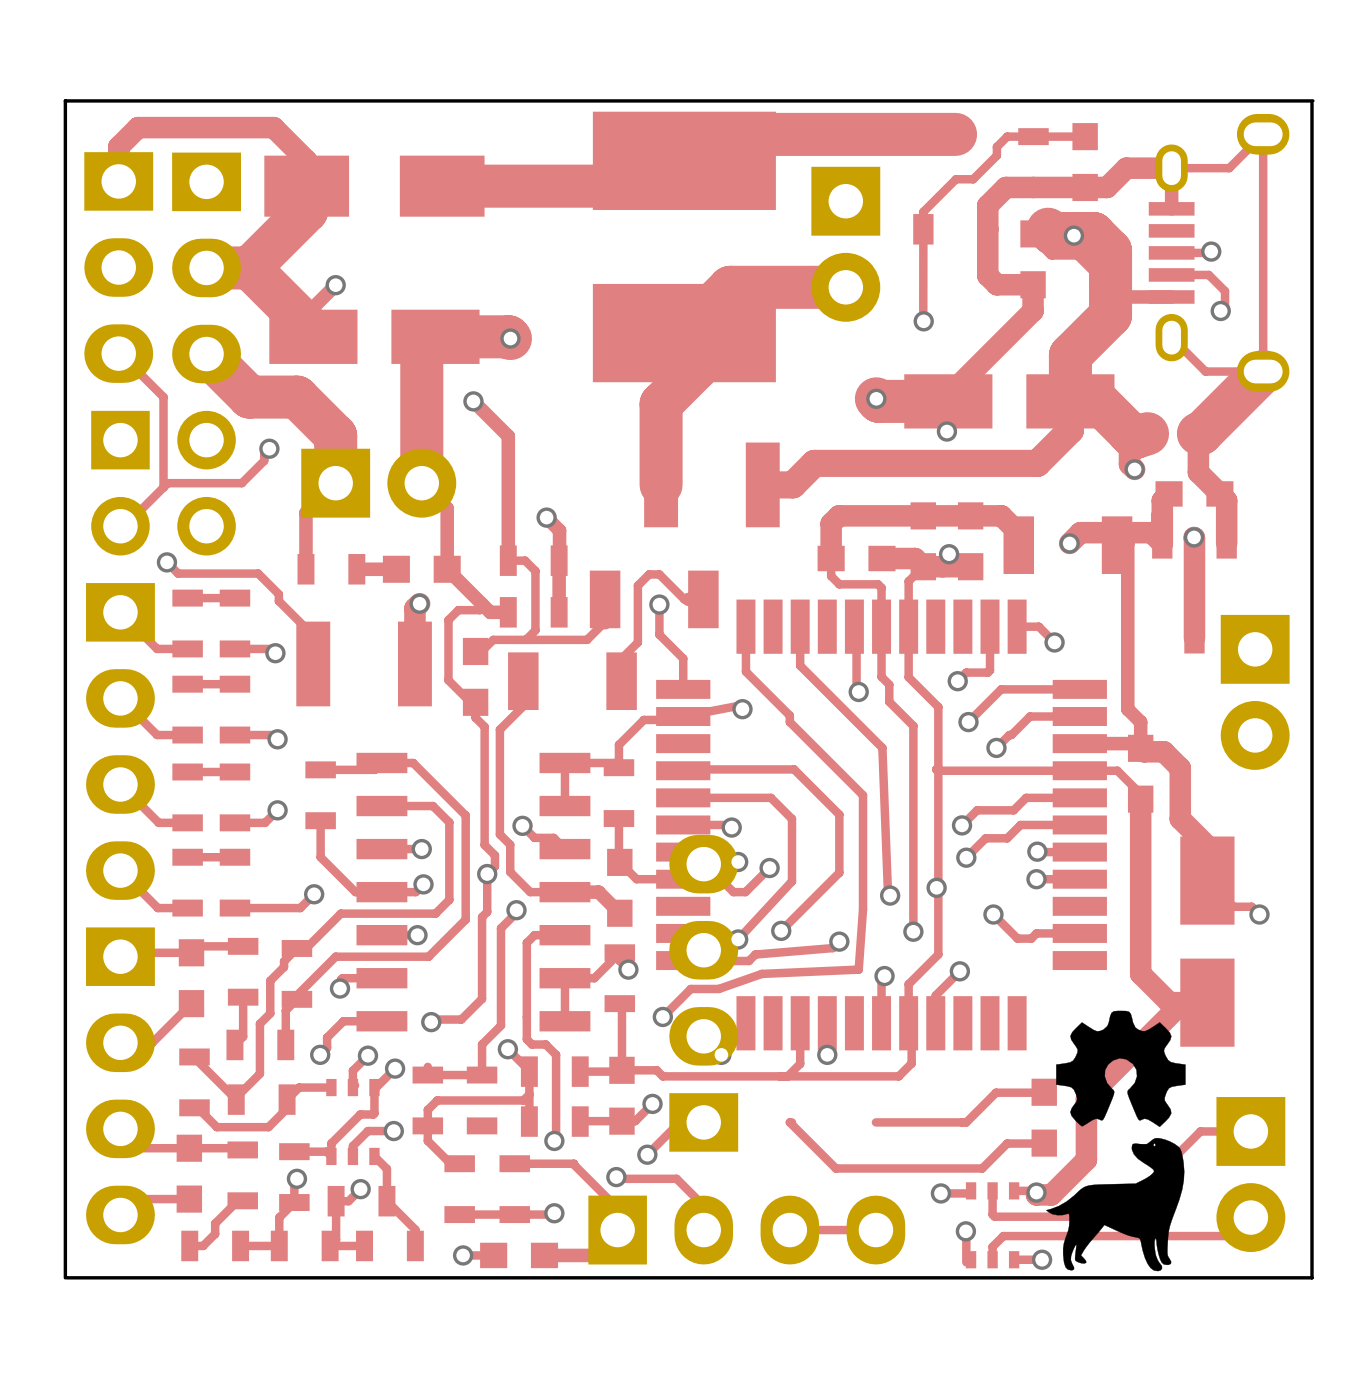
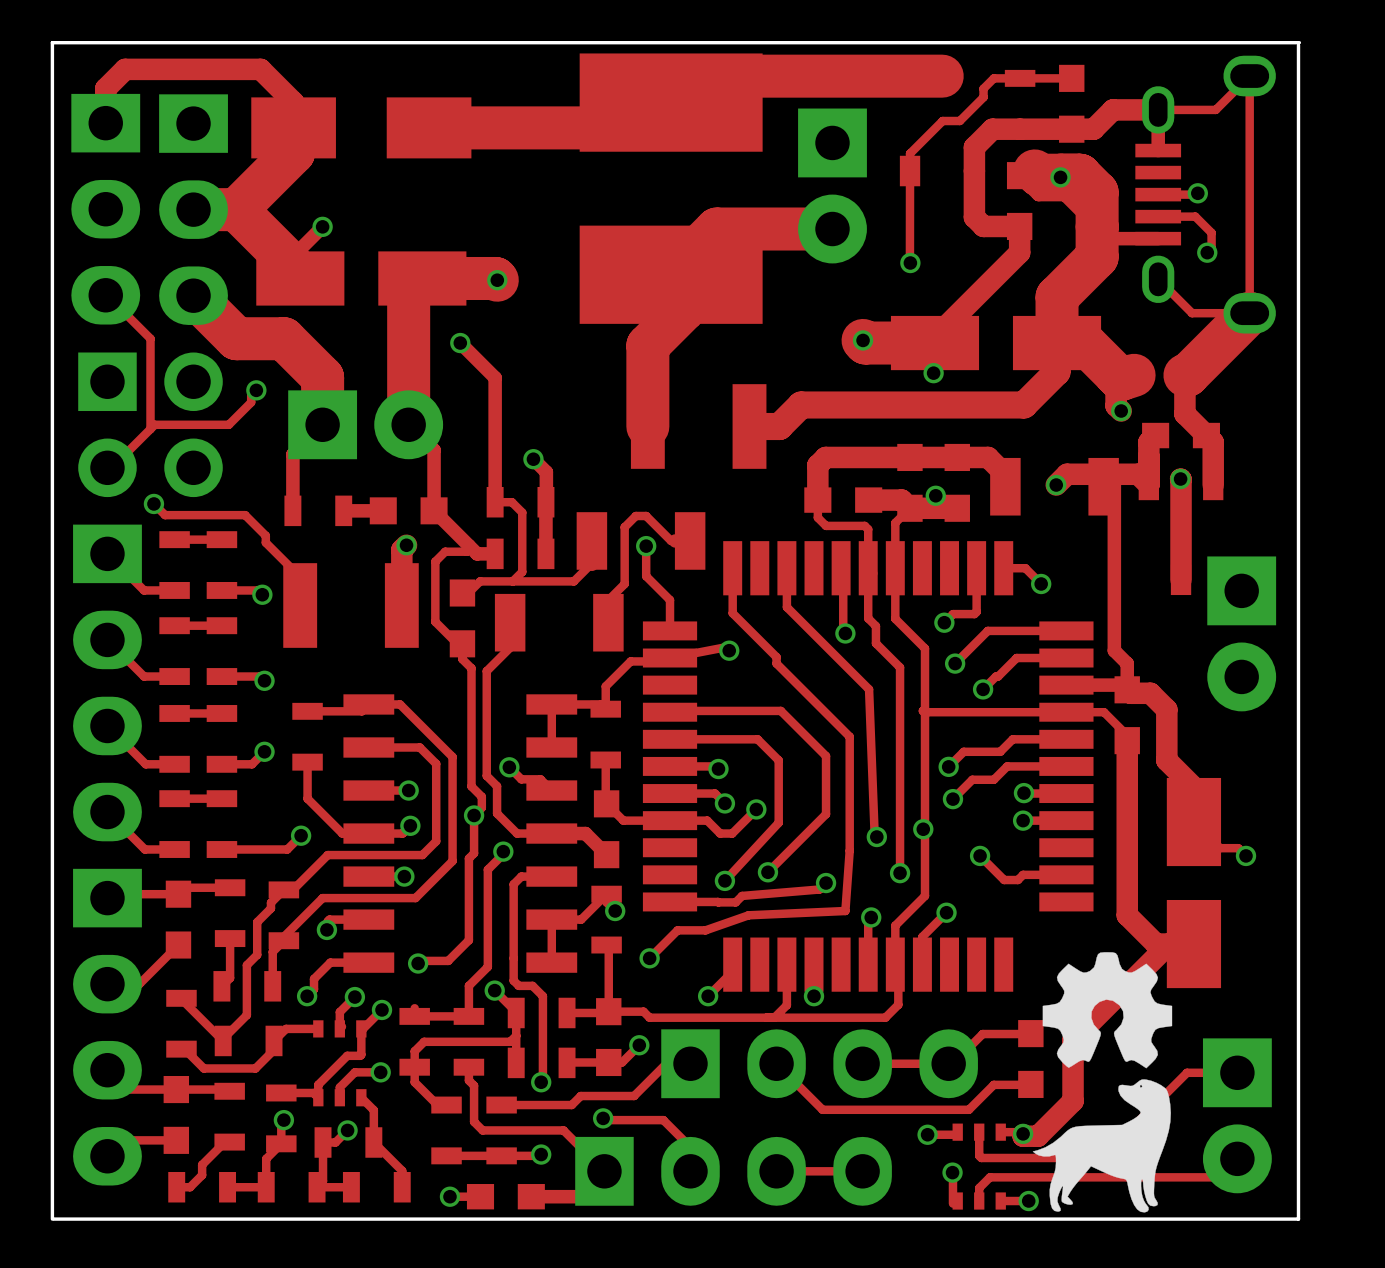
part rotation: 0° (703, 993) -> 90° clockwise (819, 1063)
track: none -> (468, 1067) (468, 1080) (474, 1085) (474, 1121) (482, 1130) (563, 1130) (604, 1171)
via: (647, 1154) -> none
track: (573, 1163) (617, 1208) (617, 1230) -> (560, 1105) (571, 1105) (580, 1096) (634, 1096)

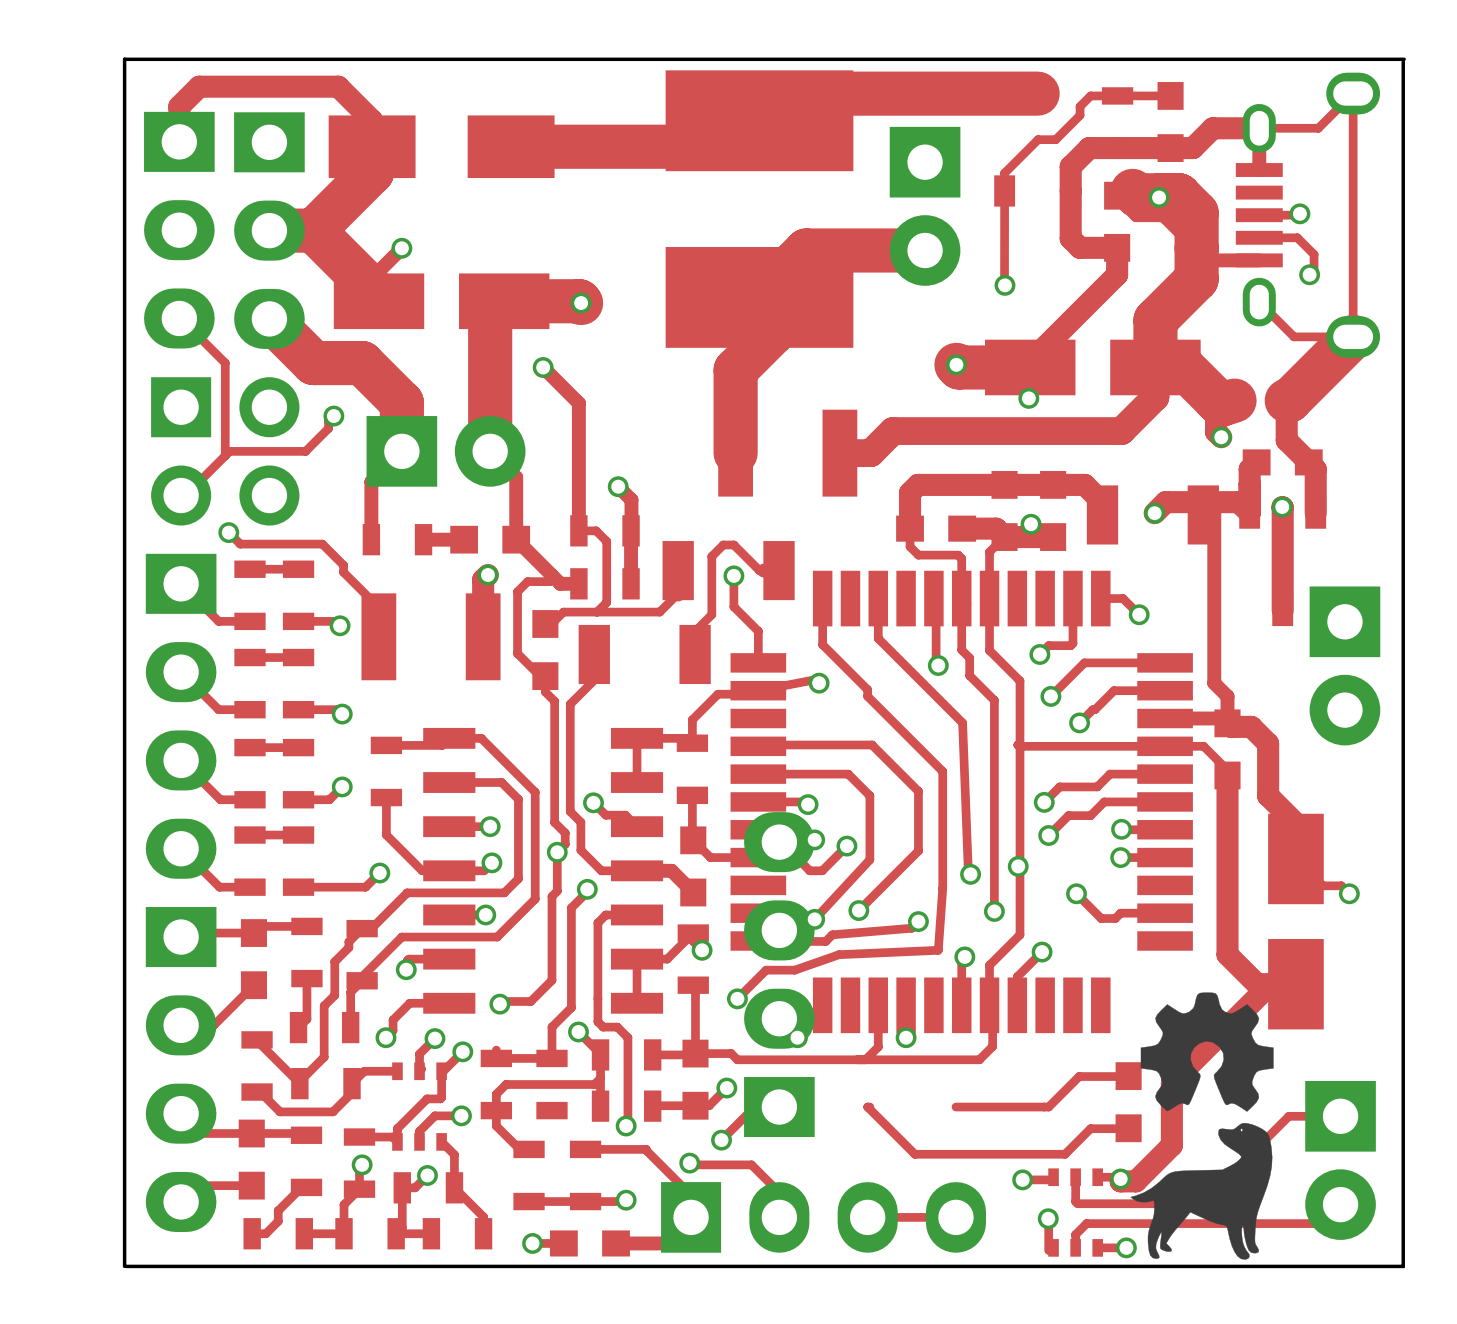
part rotation: 0° (819, 1063) -> 90° counterclockwise (779, 974)
track: (468, 1067) (468, 1080) (474, 1085) (474, 1121) (482, 1130) (563, 1130) (604, 1171) -> none
track: (634, 1096) (580, 1096) (571, 1105) (560, 1105) -> (691, 1217) (691, 1195) (646, 1149)
via: none -> (721, 1140)

